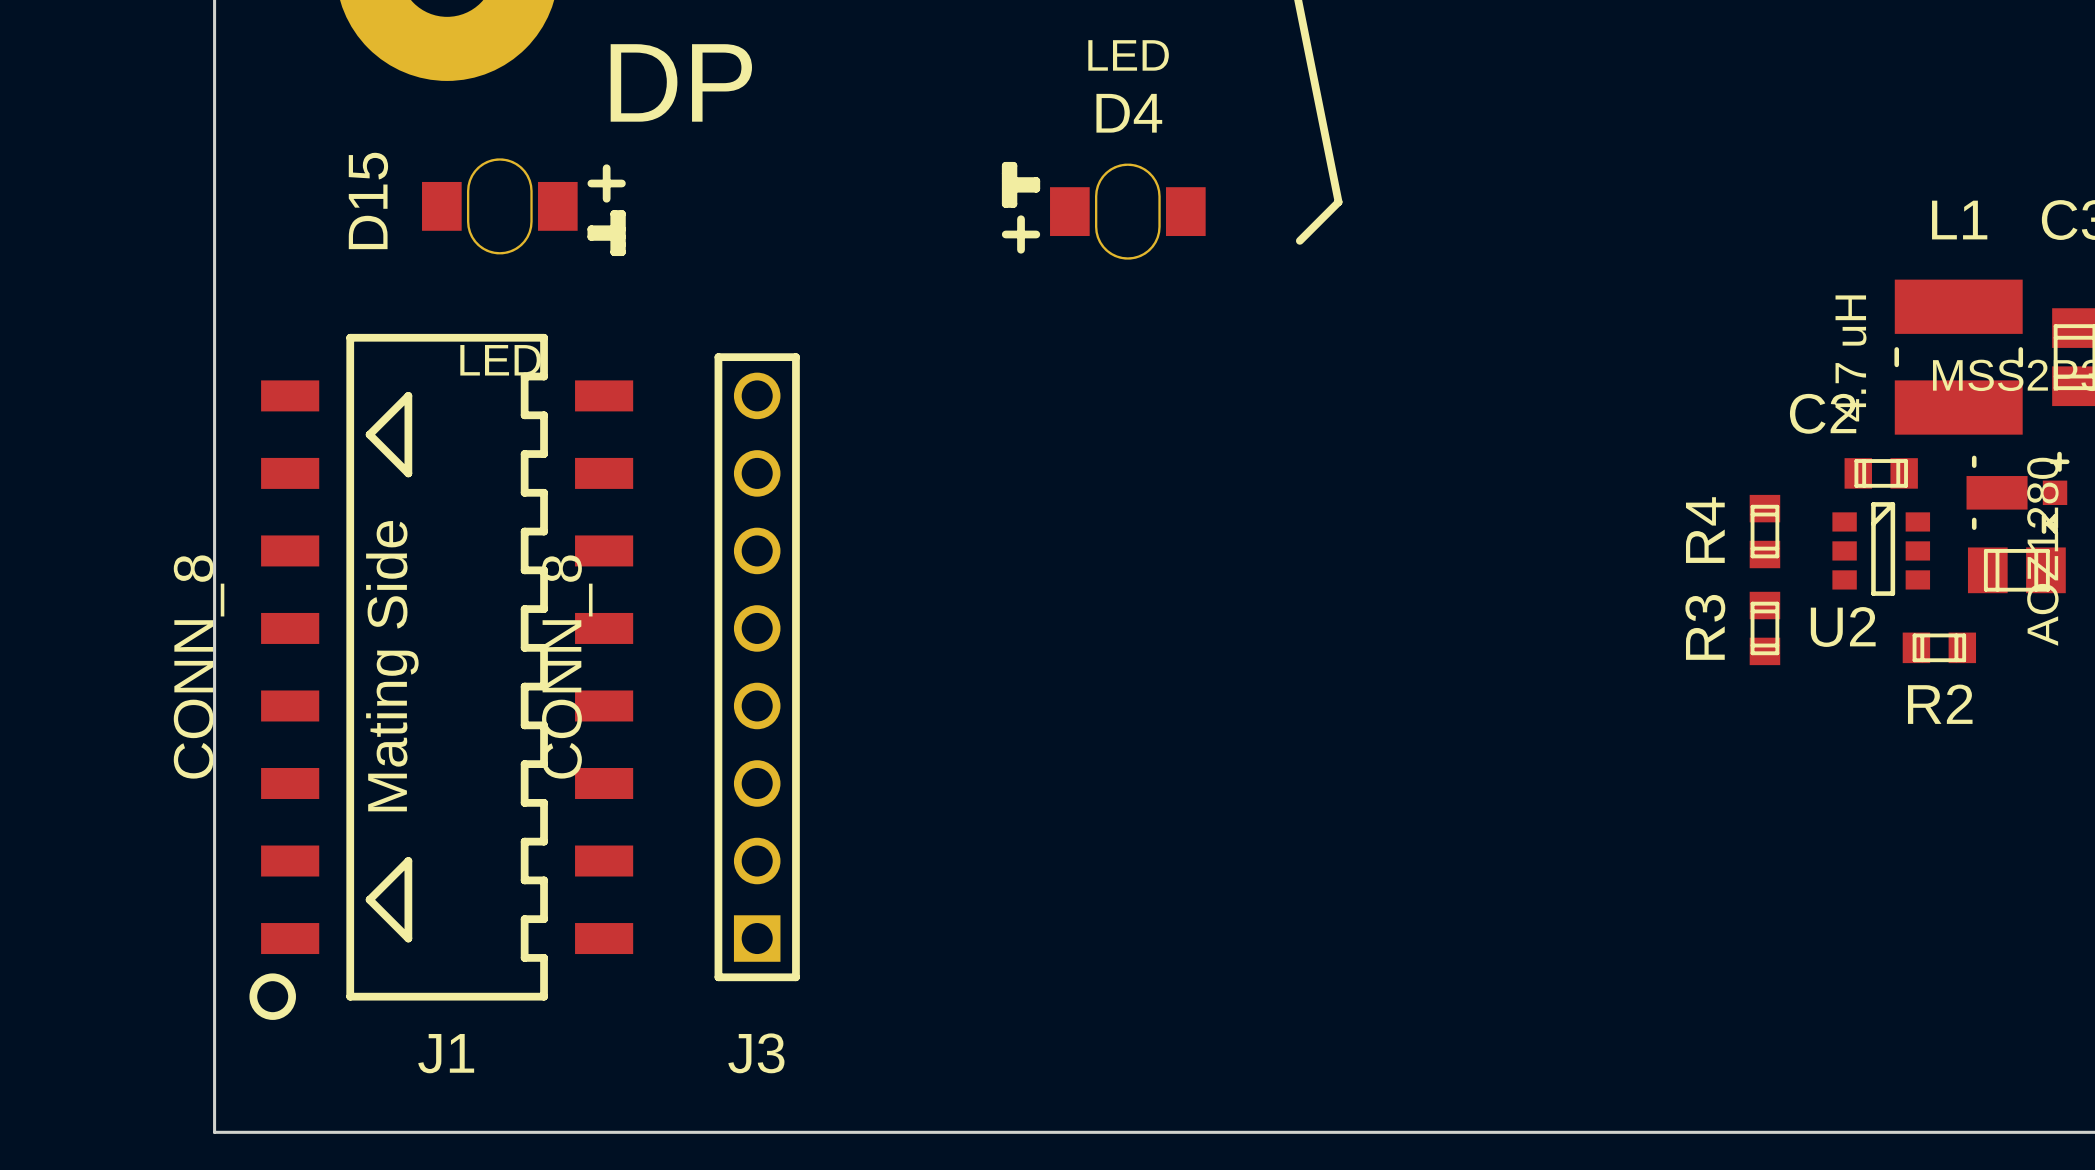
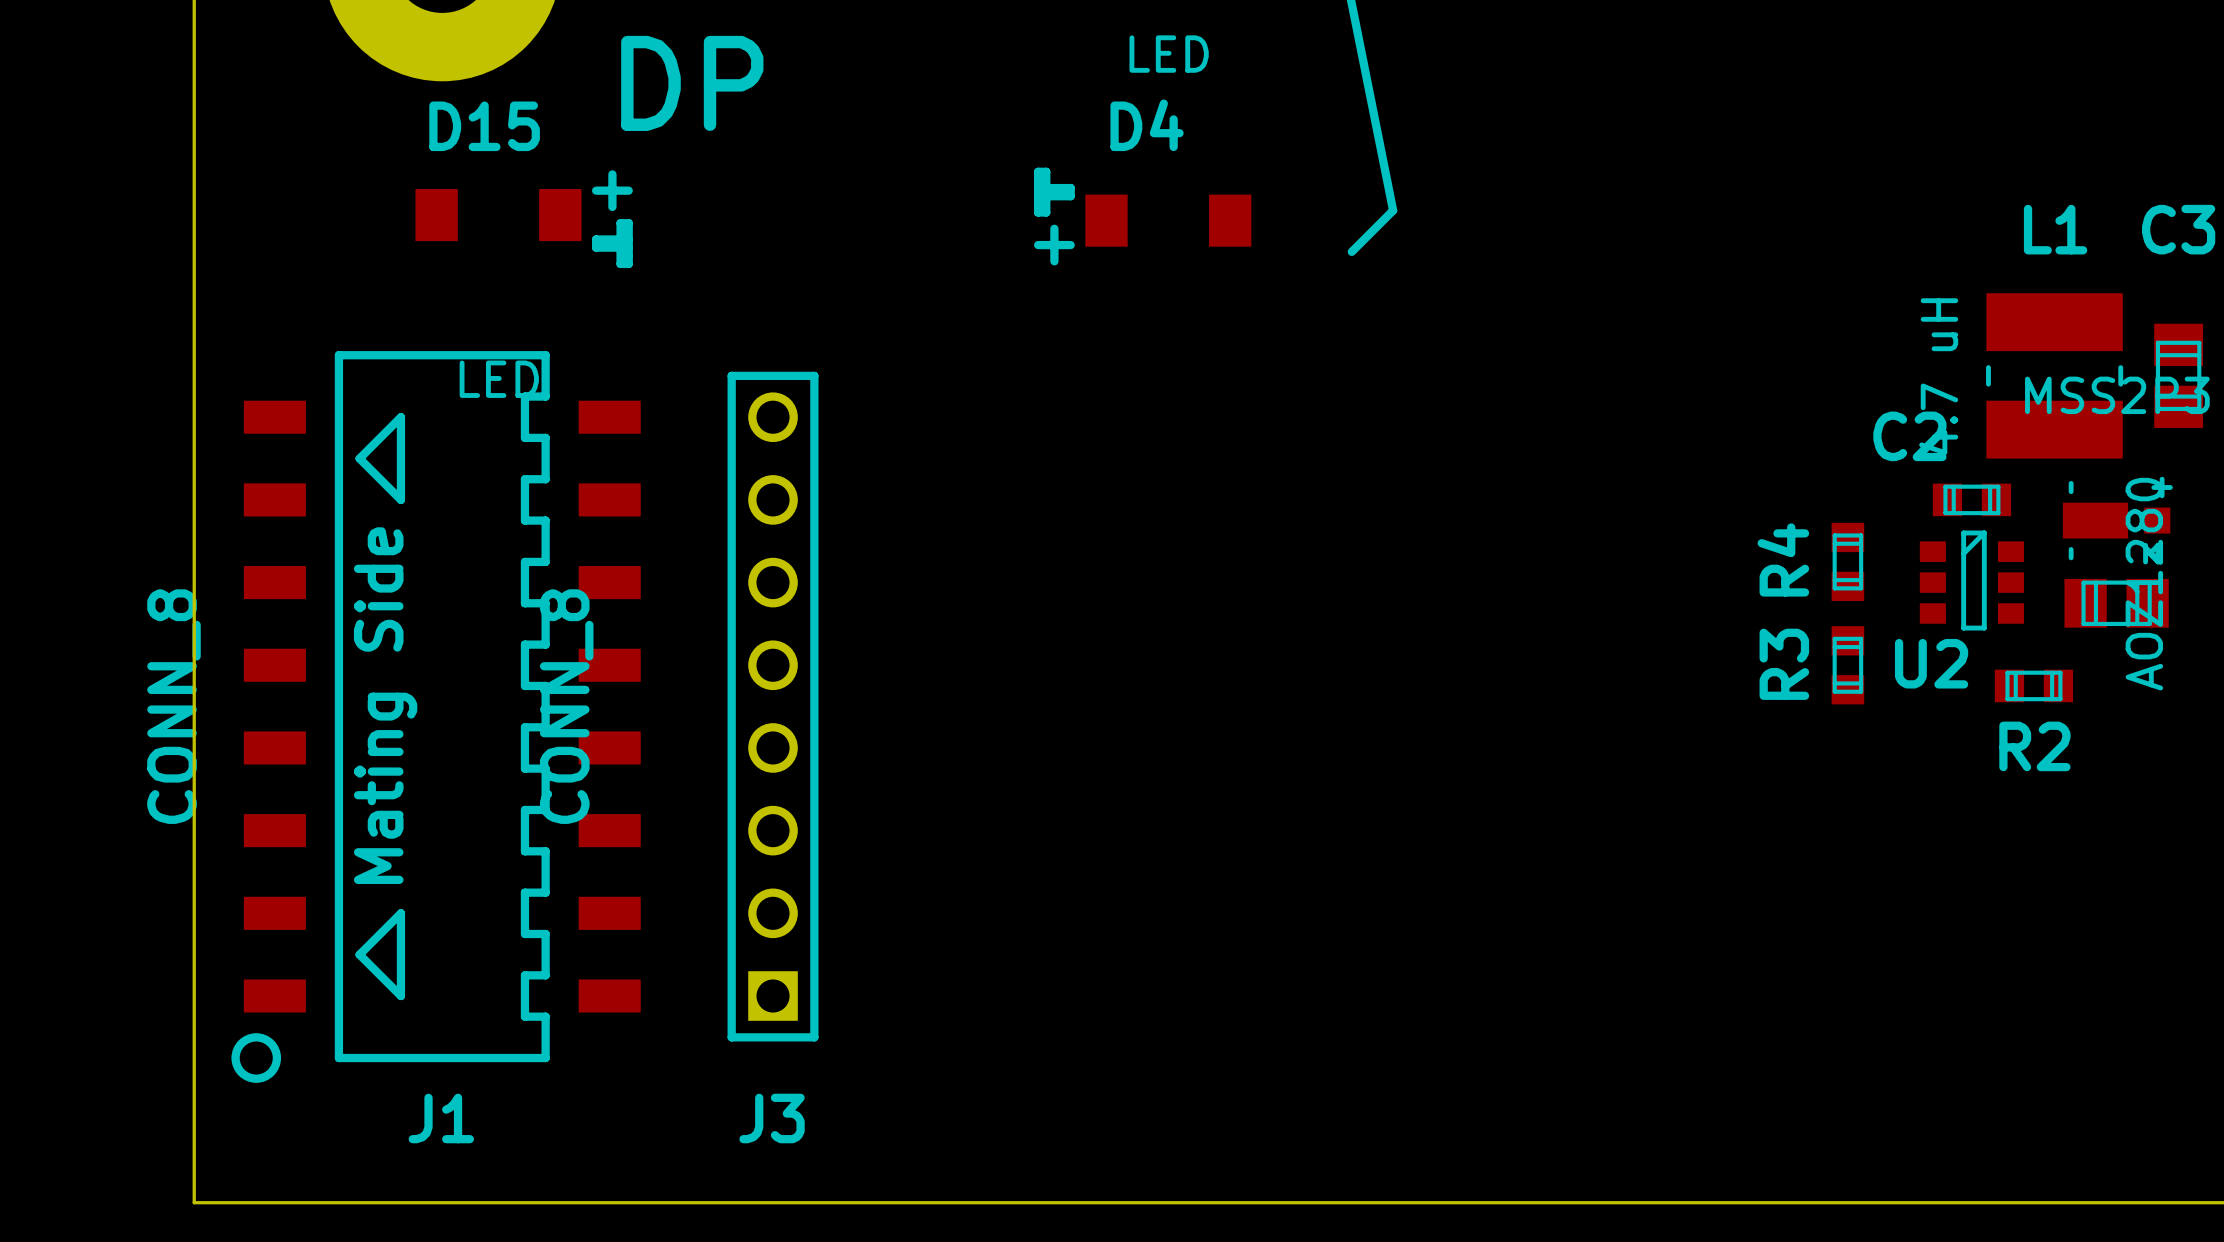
D15 footprint: [422, 158, 626, 257] -> [415, 166, 633, 269]
D4 footprint: [1001, 161, 1206, 260] -> [1034, 167, 1252, 270]
D15 name position: D15 (368, 200) -> D15 (484, 126)

